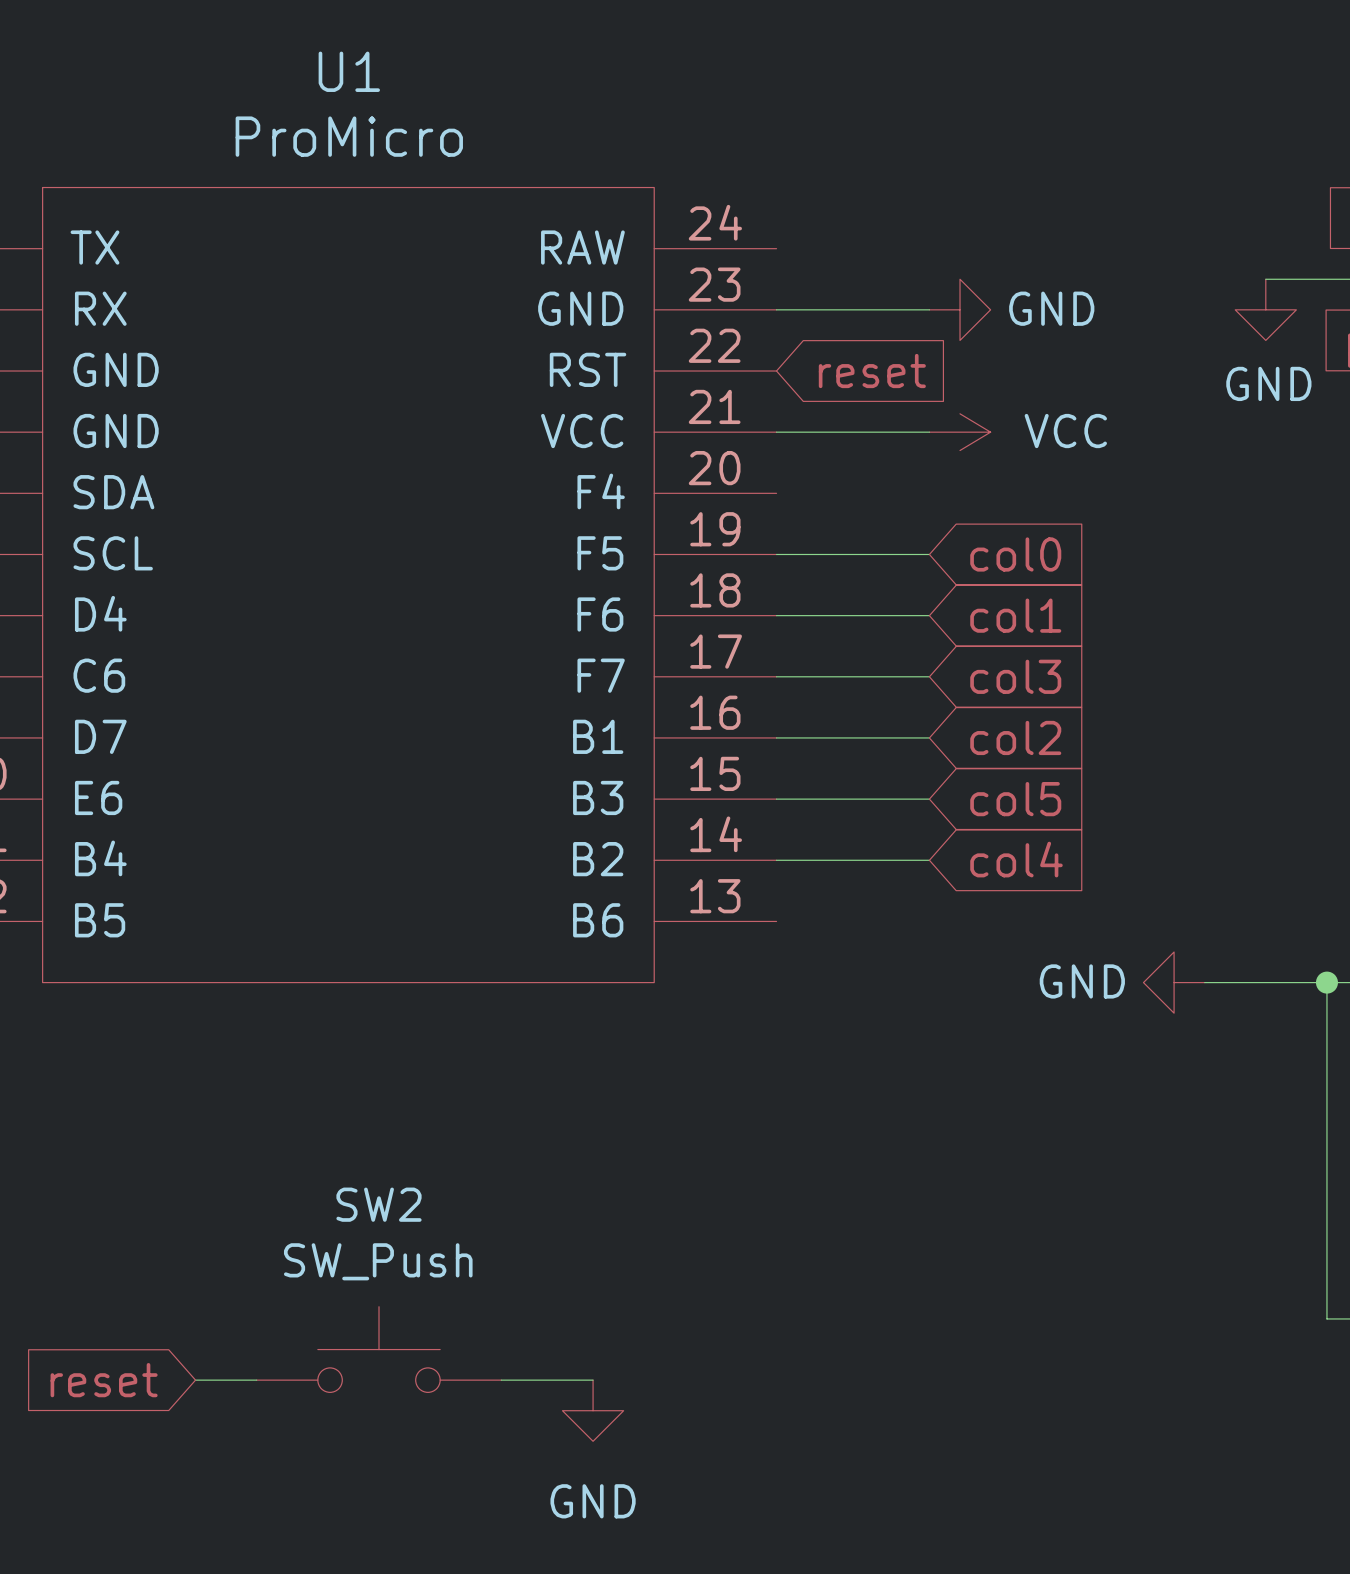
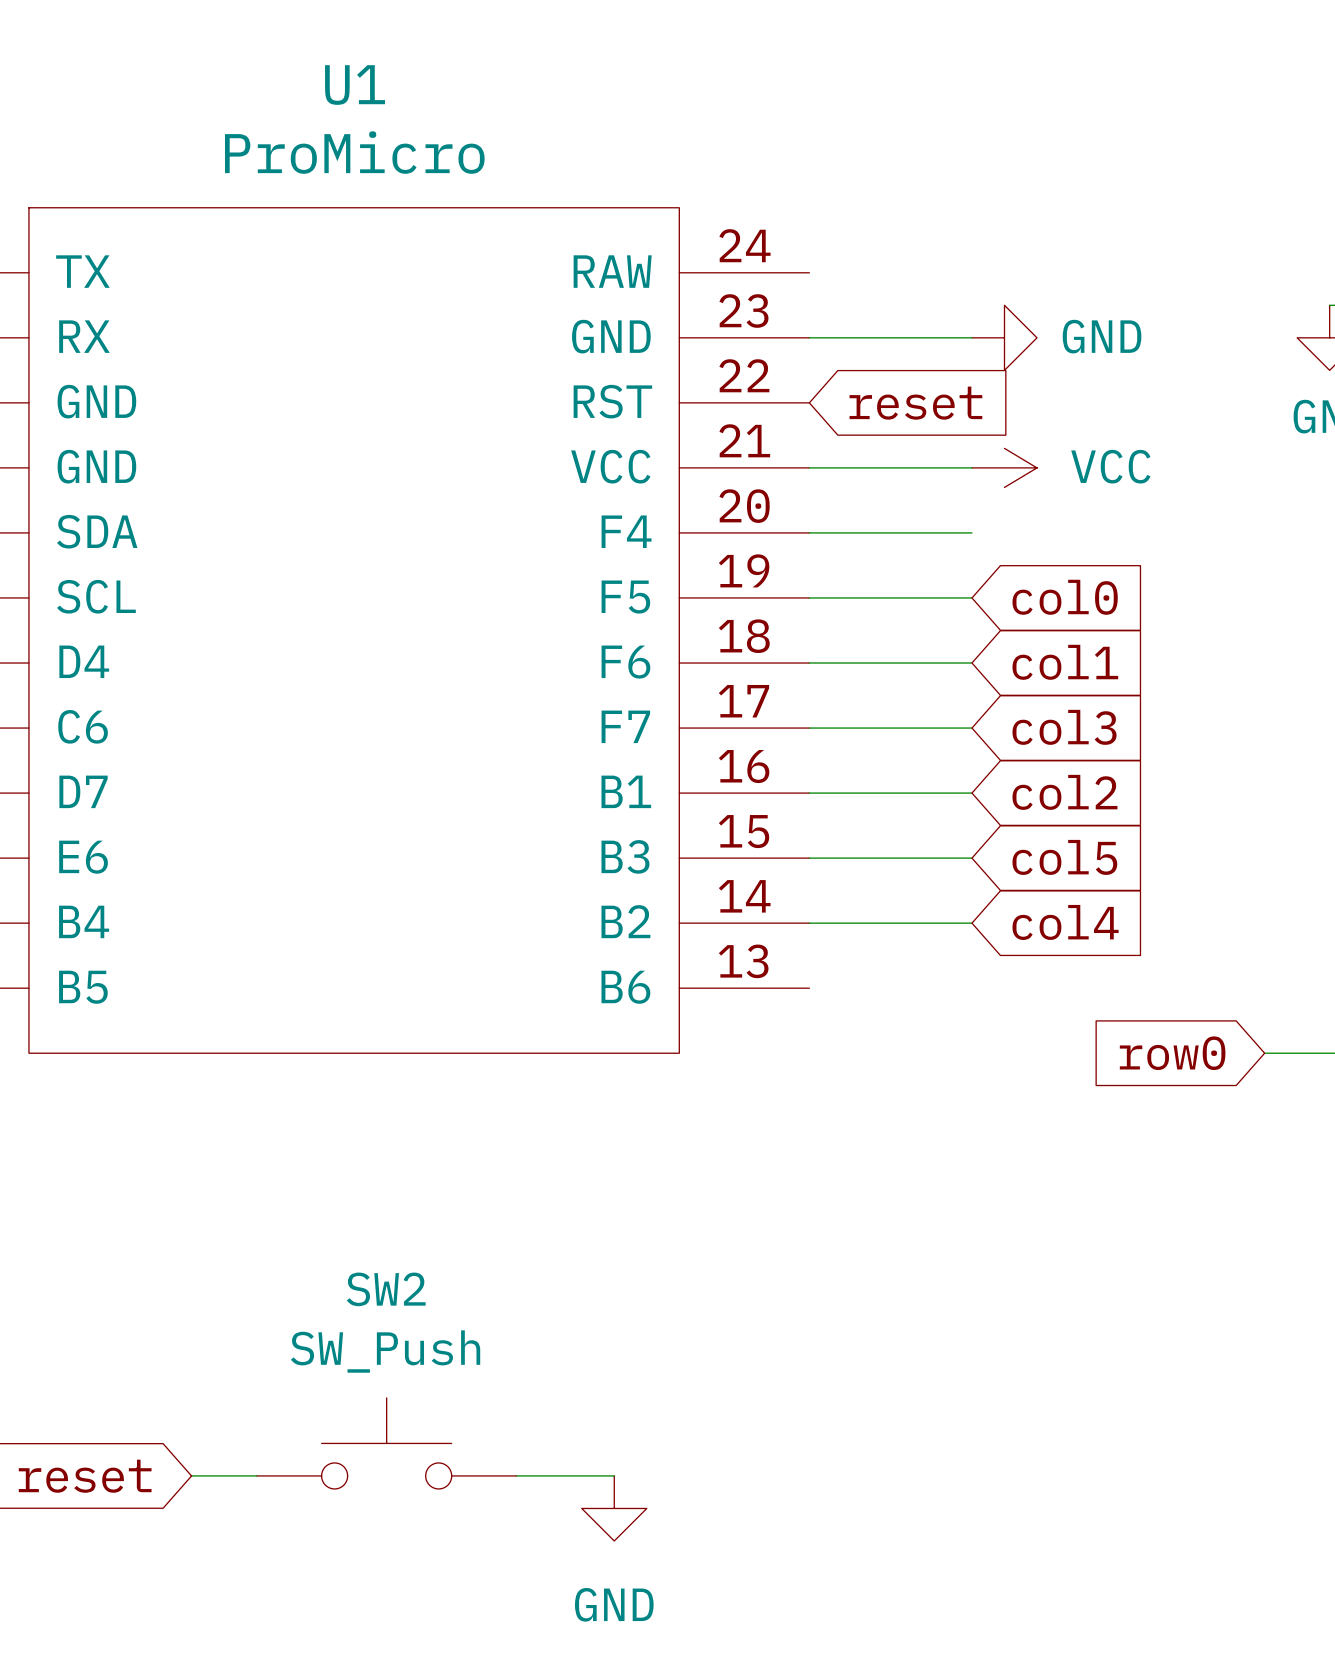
wire: none -> (809, 532) (971, 532)
global label: none -> row0 (1172, 1053)
power symbol: GND (1174, 982) -> none

